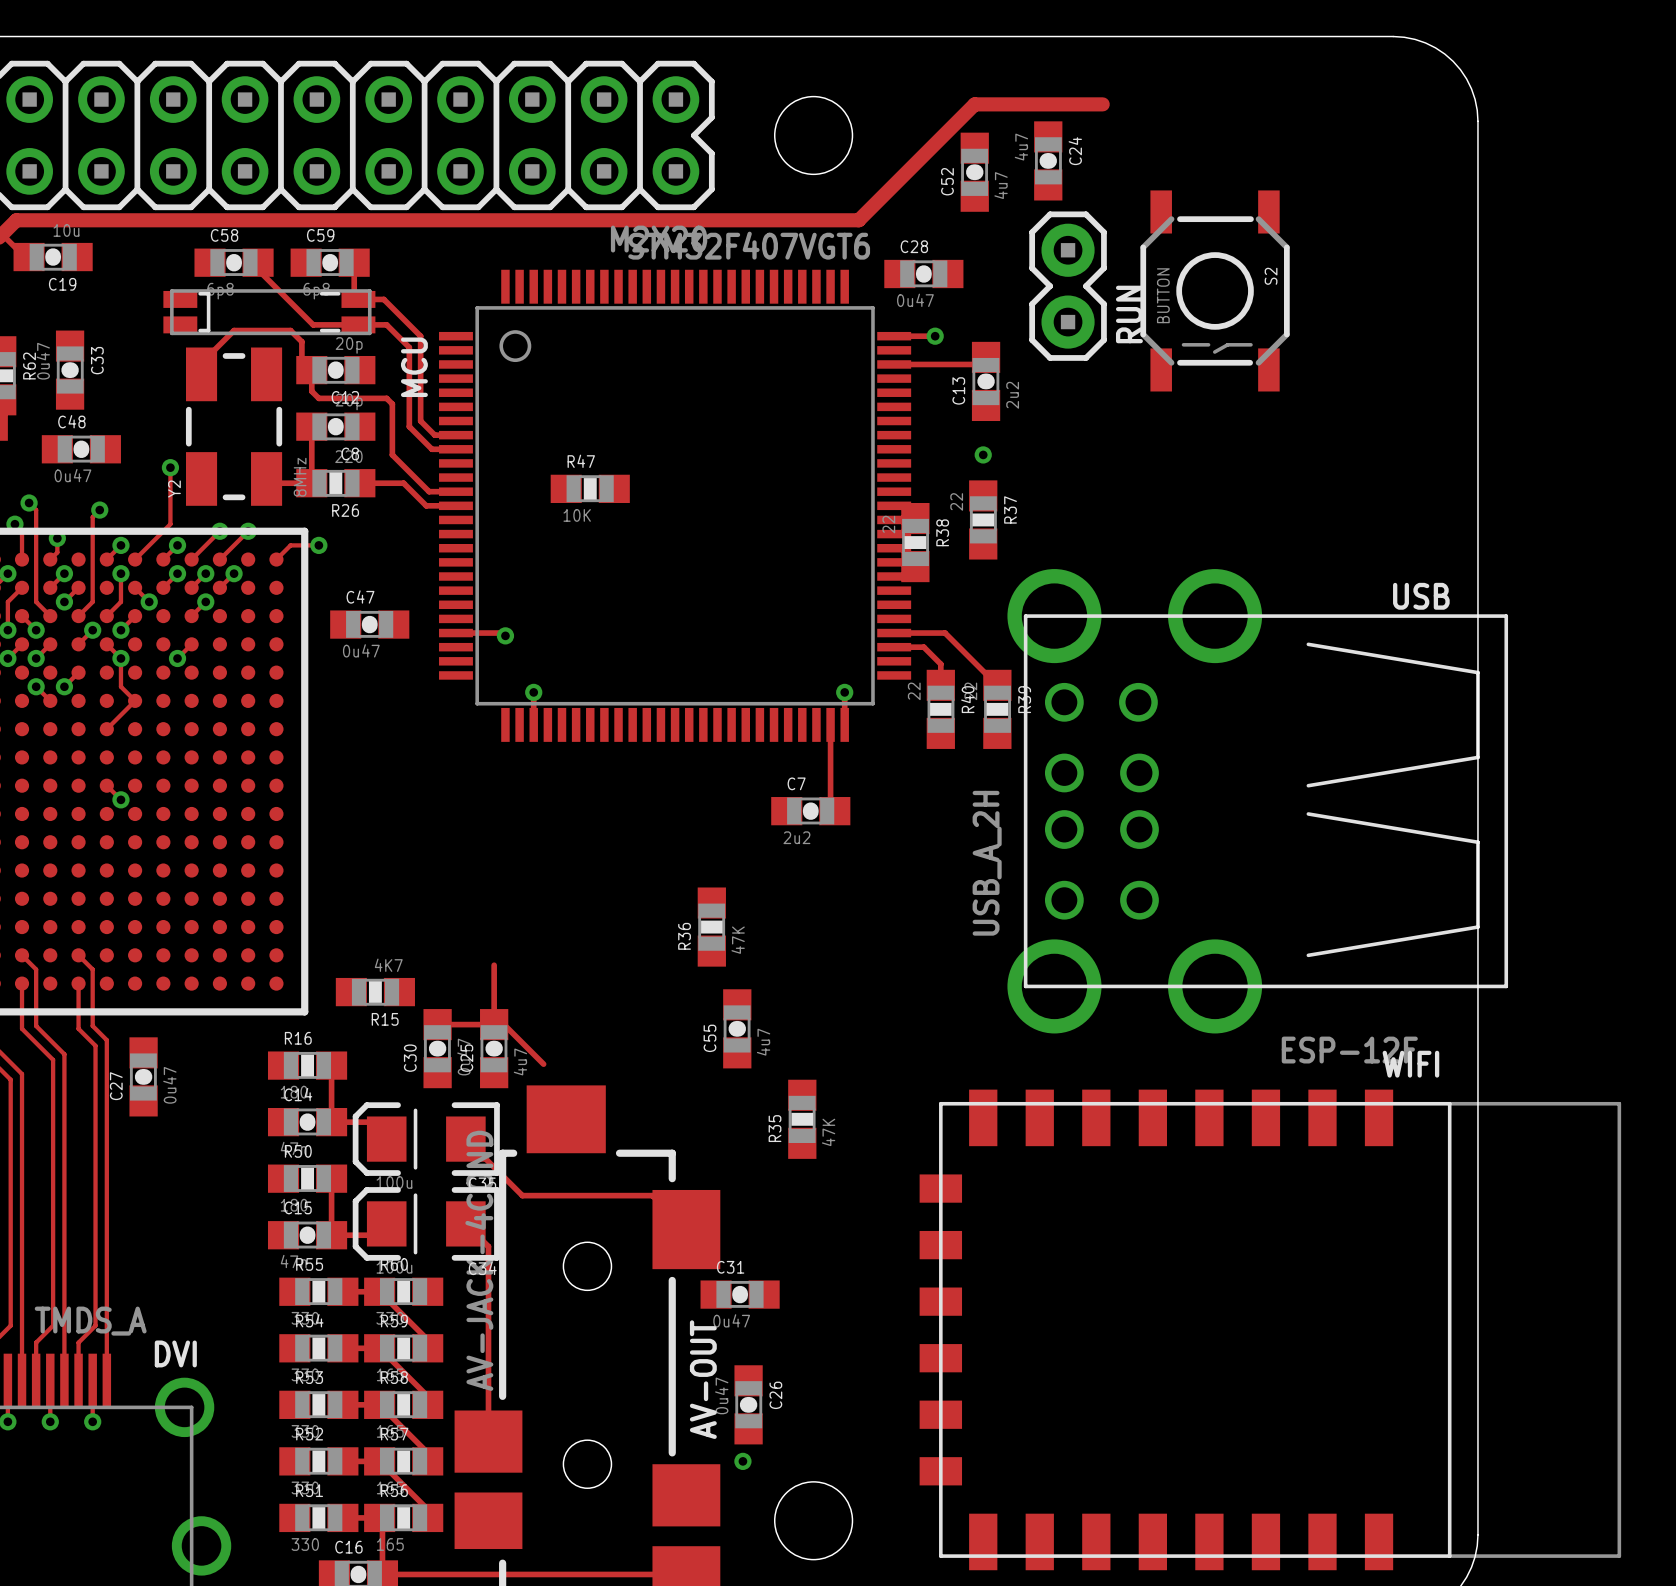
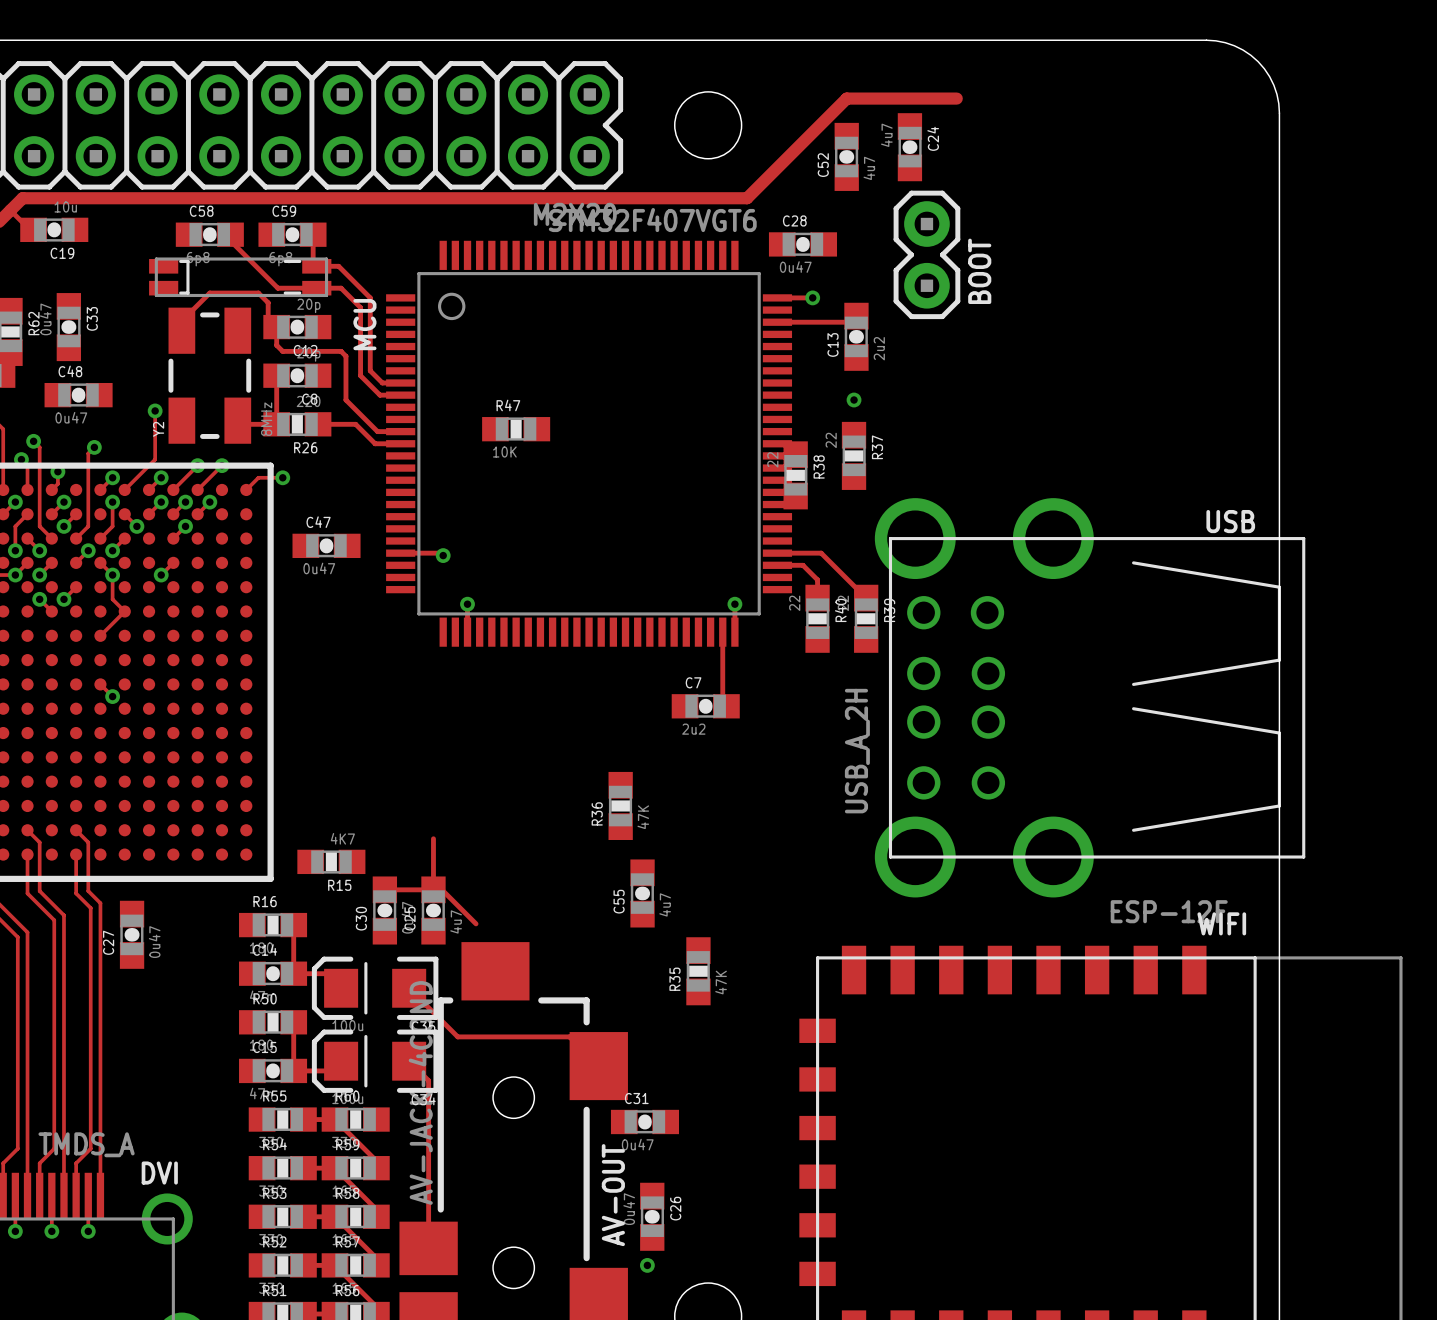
S2: BUTTON (1215, 290) -> none
RUN name: RUN (1129, 314) -> BOOT (979, 271)

